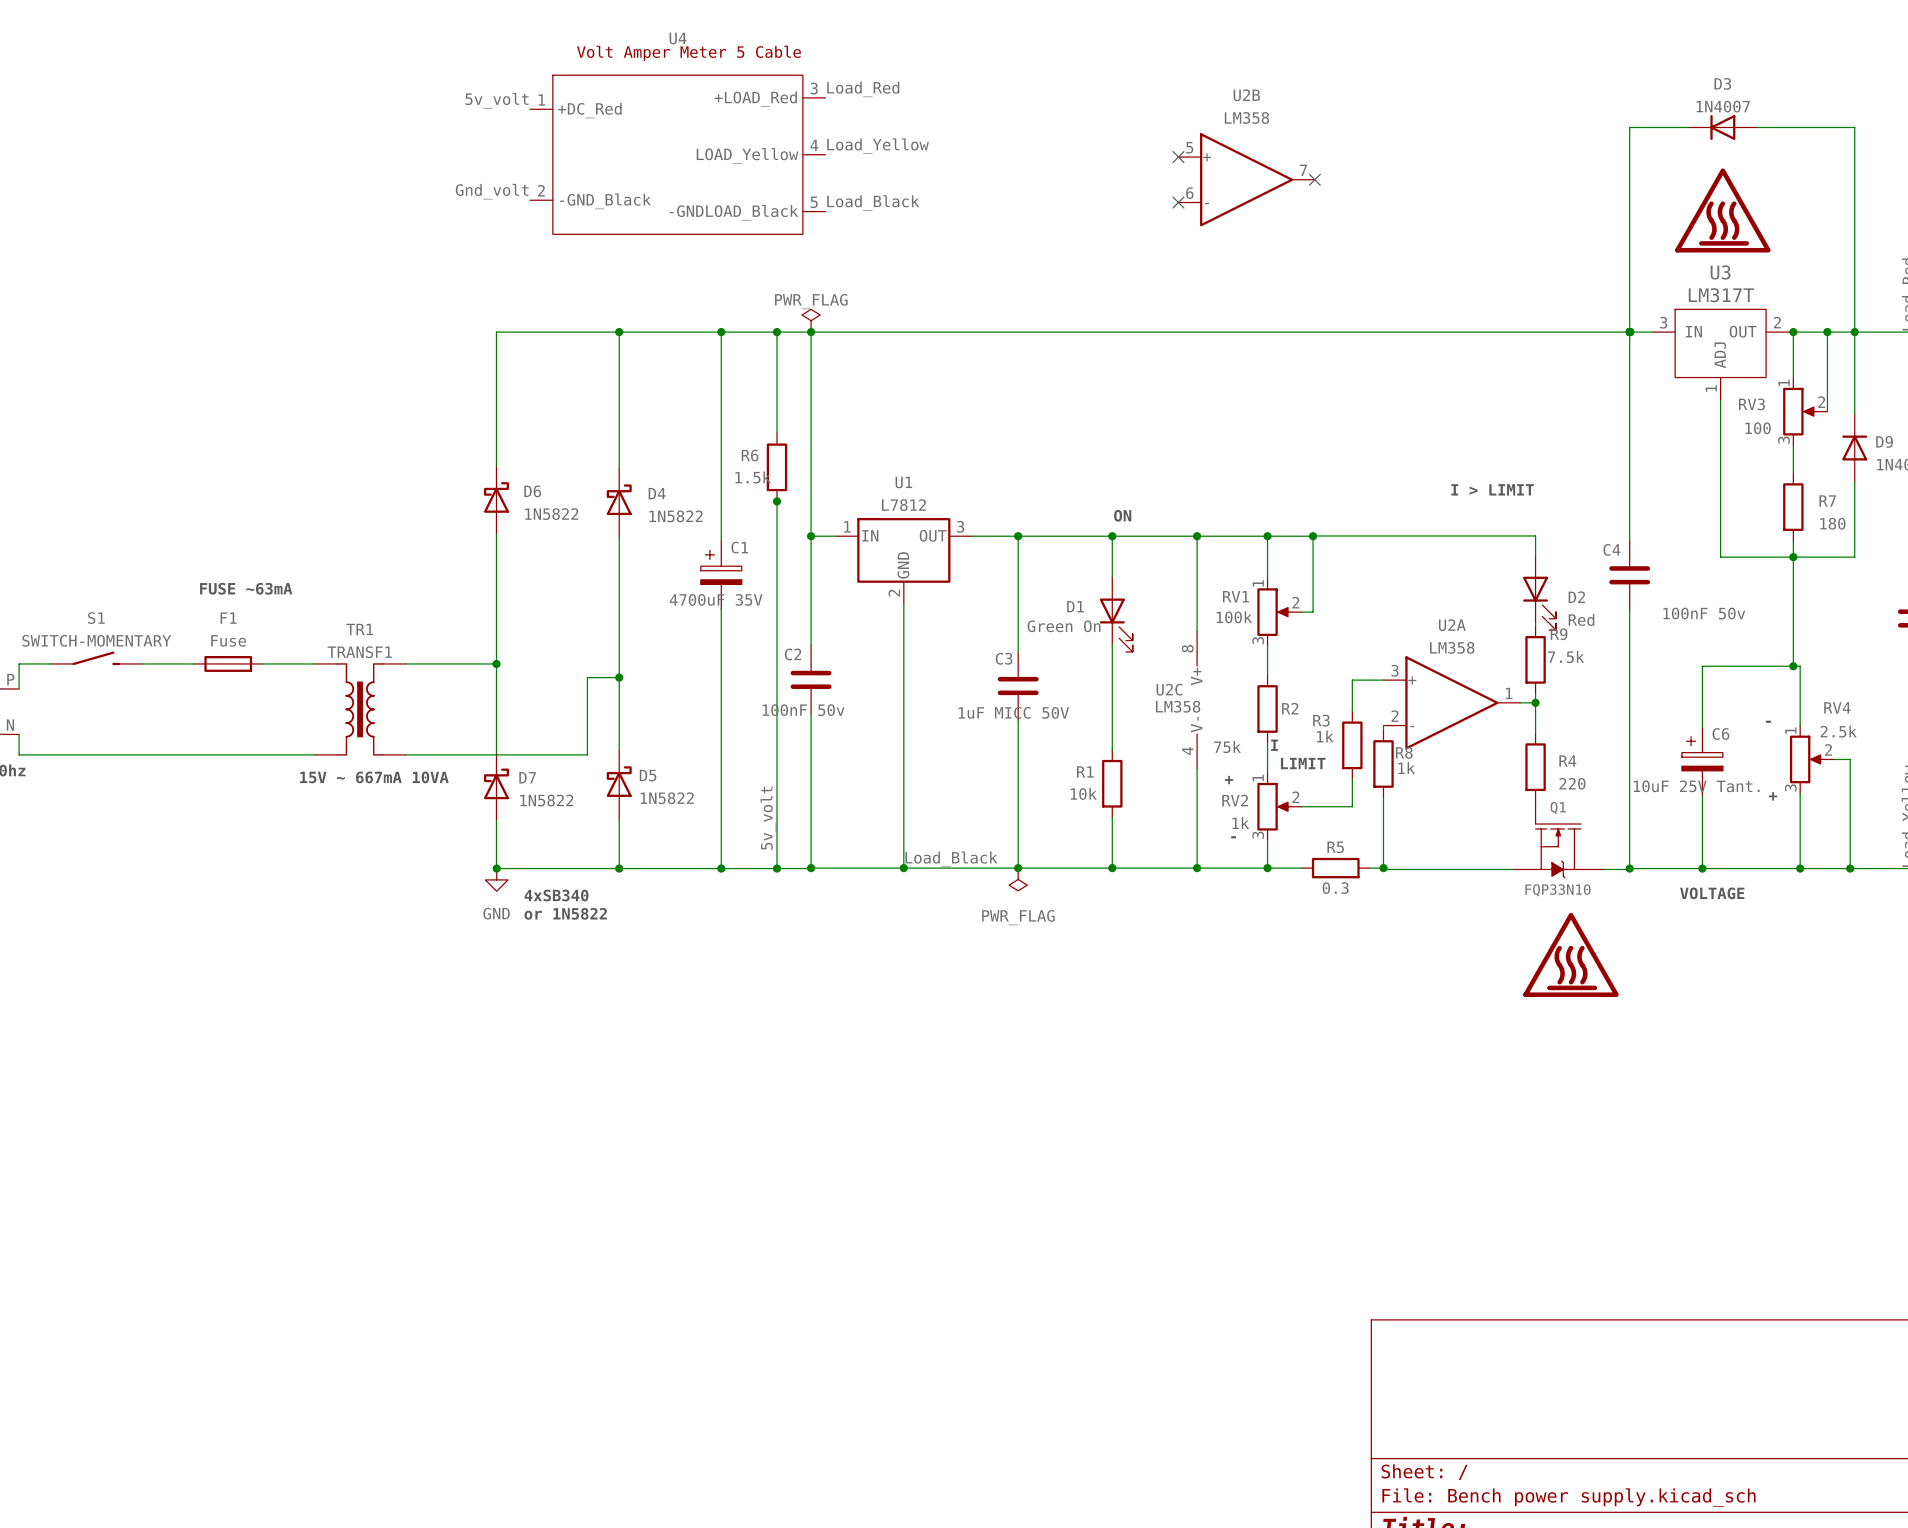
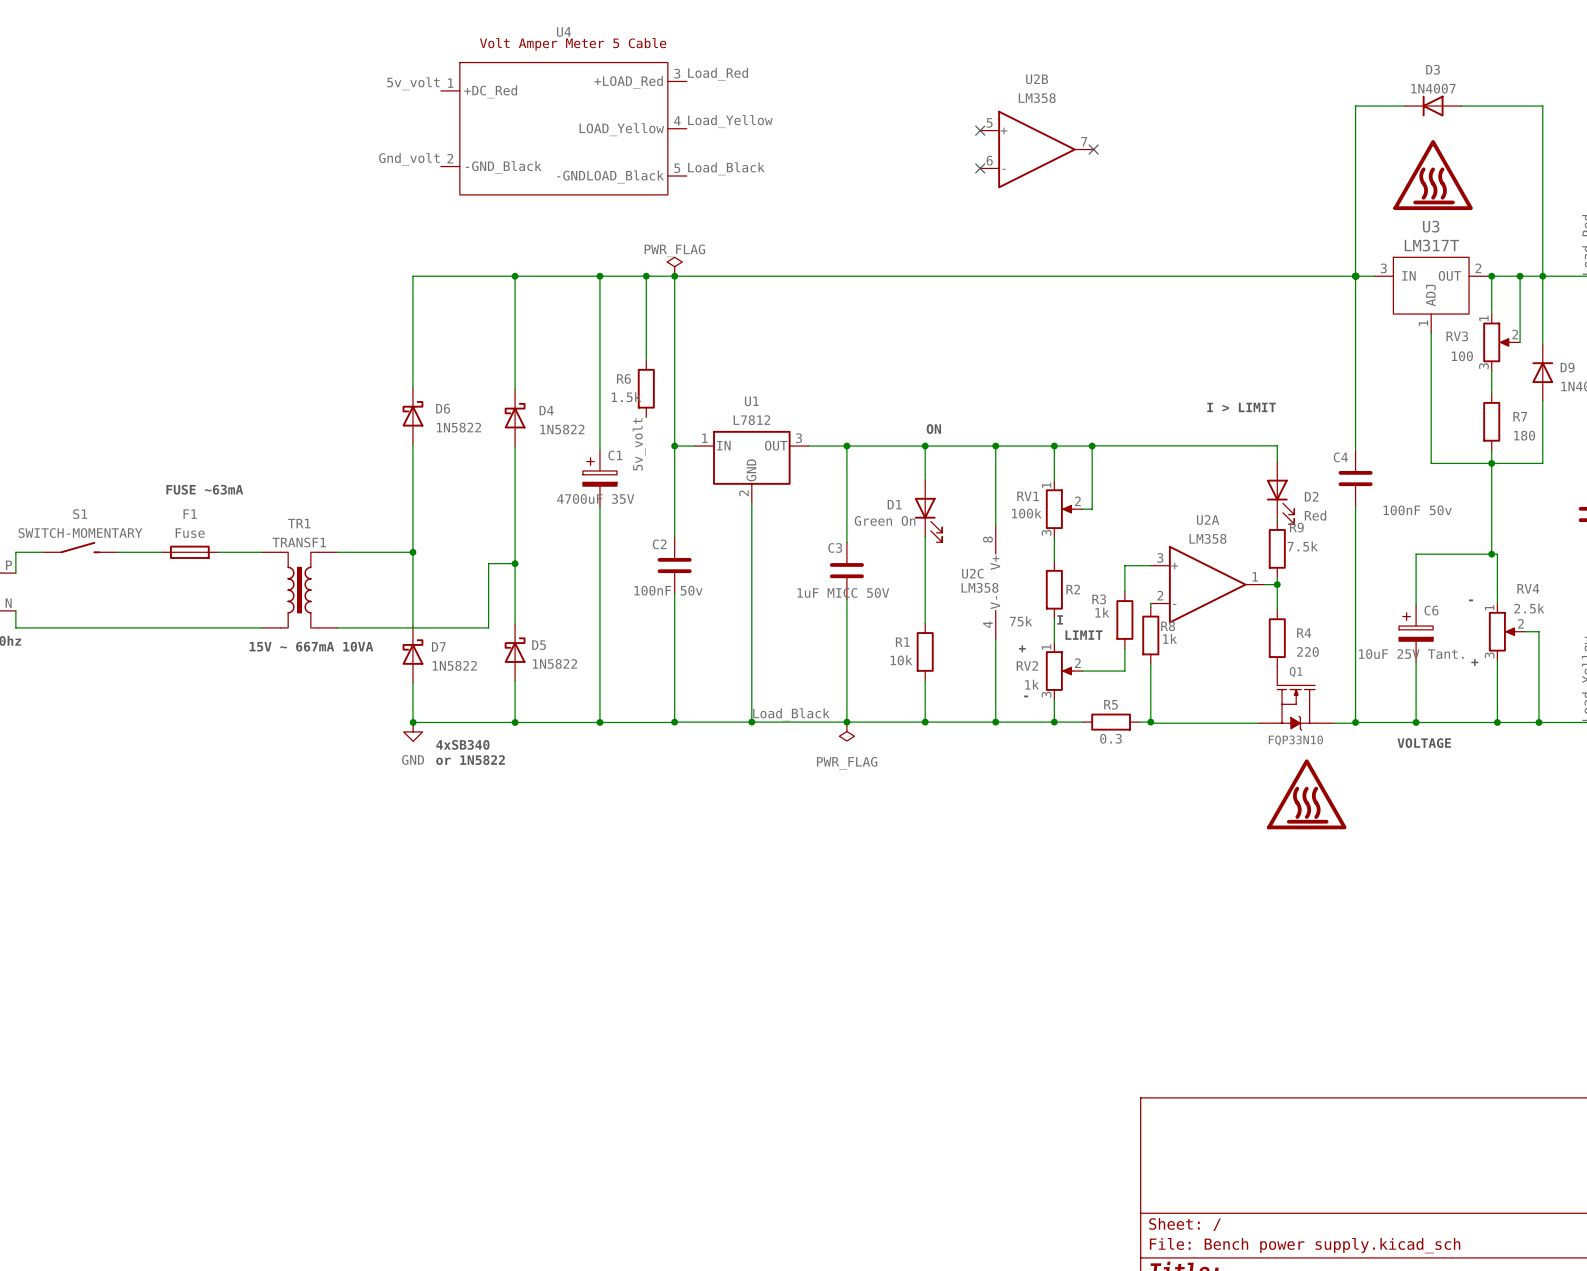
wire: (776, 501) (776, 868) -> none
junction: (776, 501) -> none
label: none -> 5v_volt (639, 444)
label: 5v_volt (768, 818) -> none
junction: (776, 868) -> none

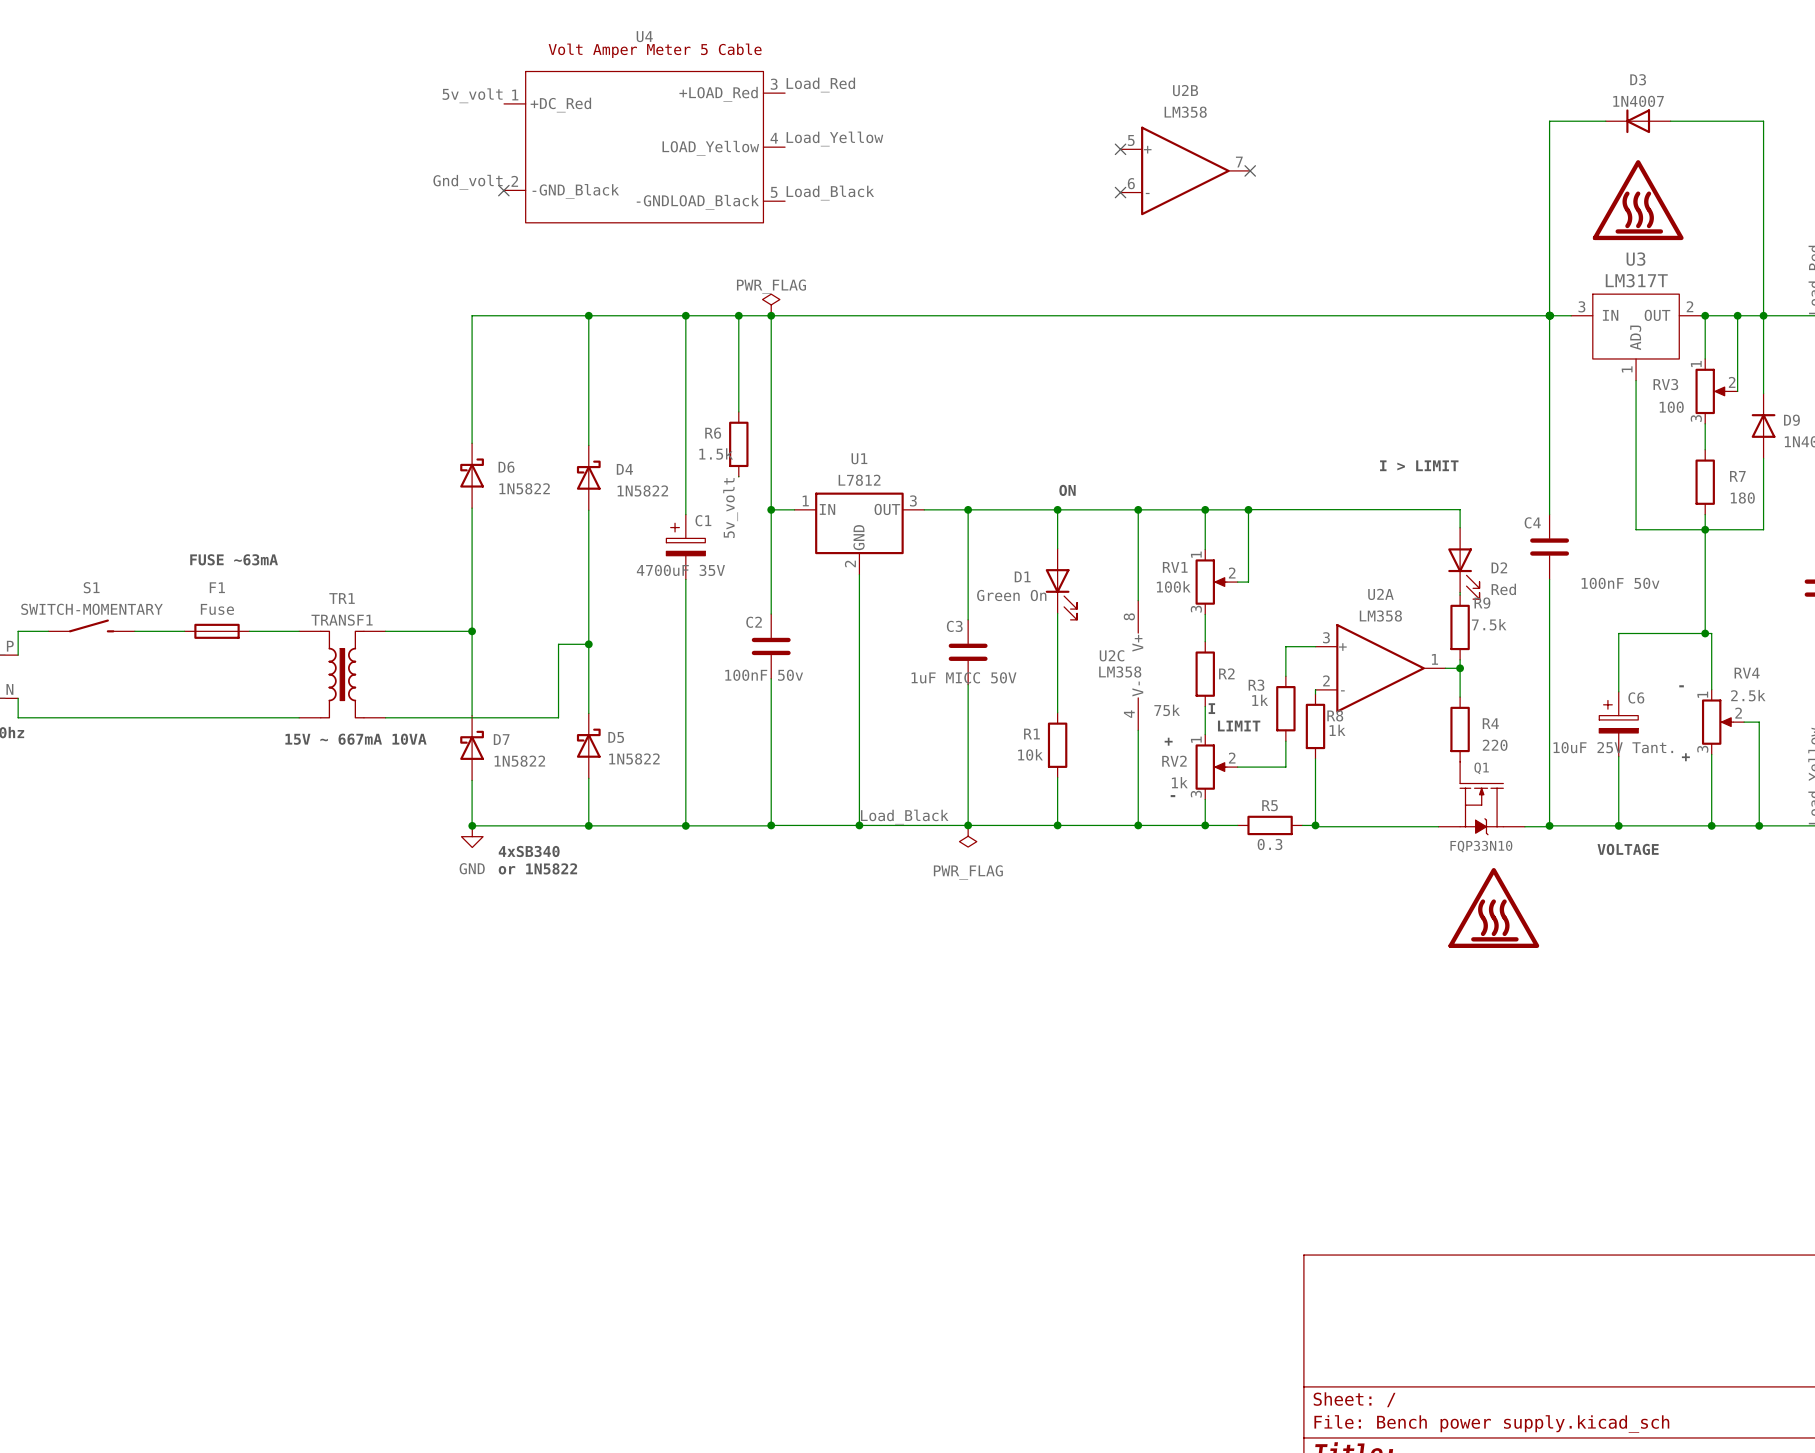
no-connect mark: none -> (503, 190)

